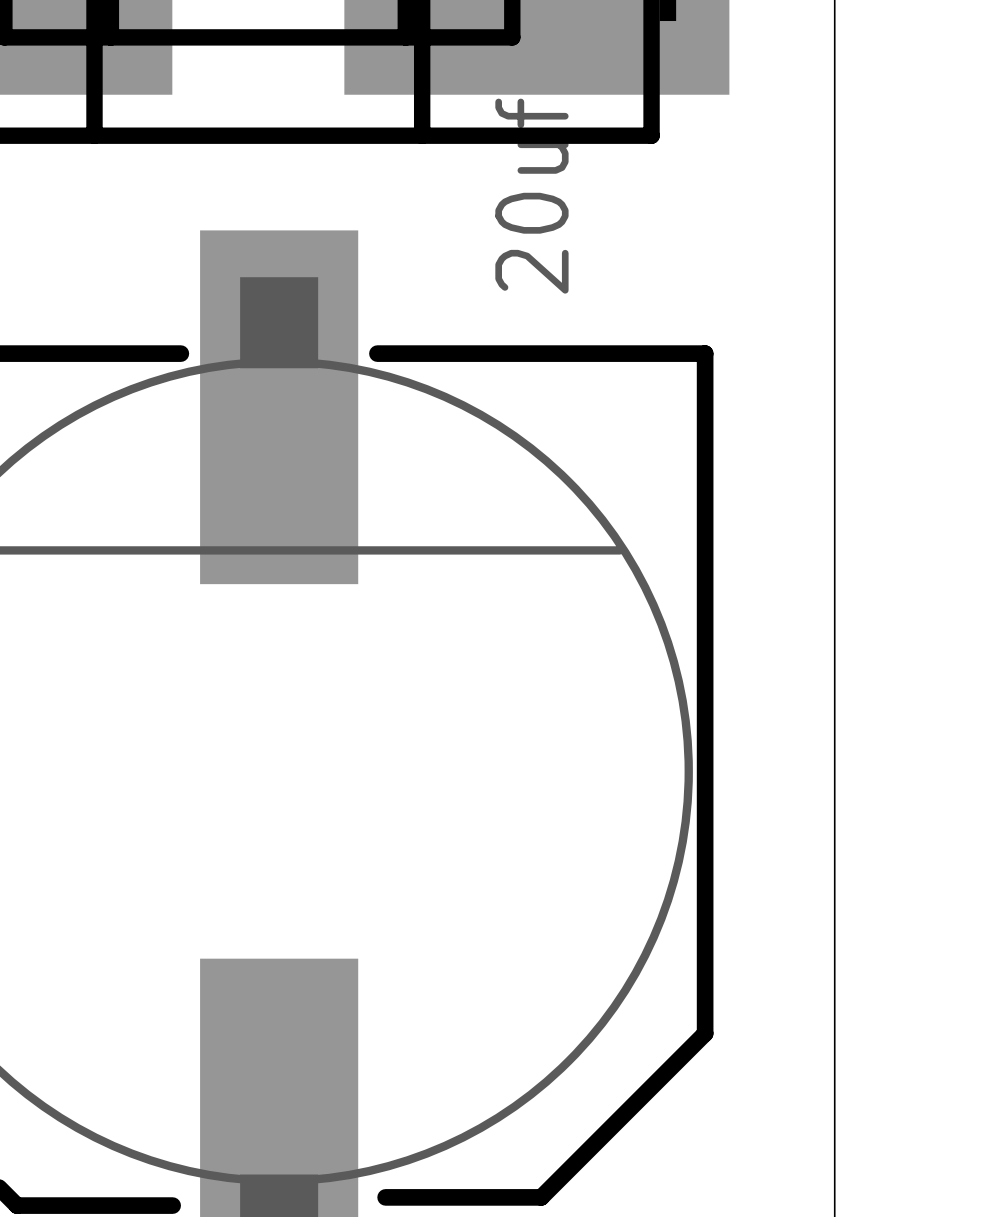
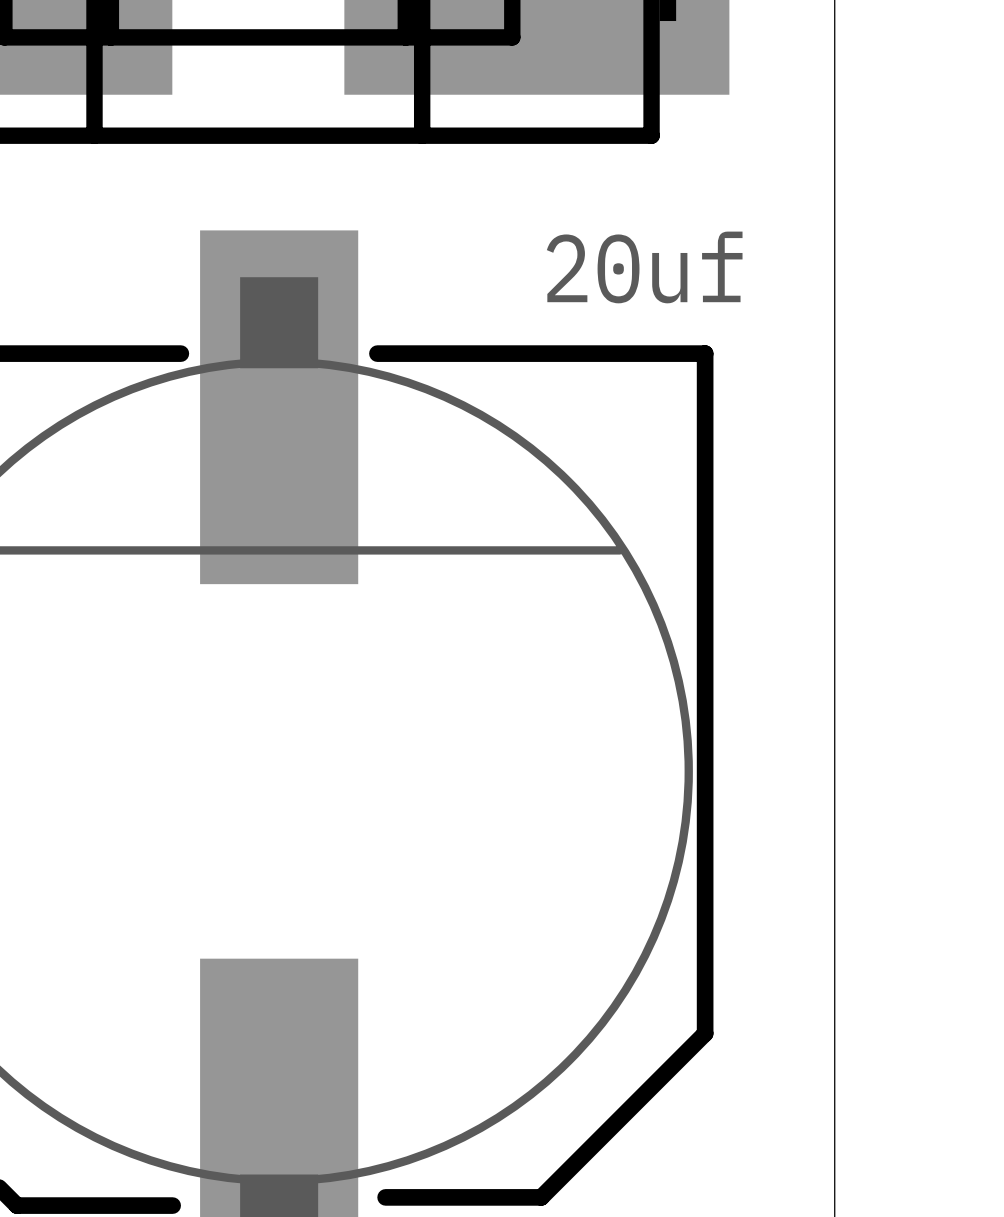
part value rotation: 0° (531, 196) -> 90° clockwise (644, 267)

